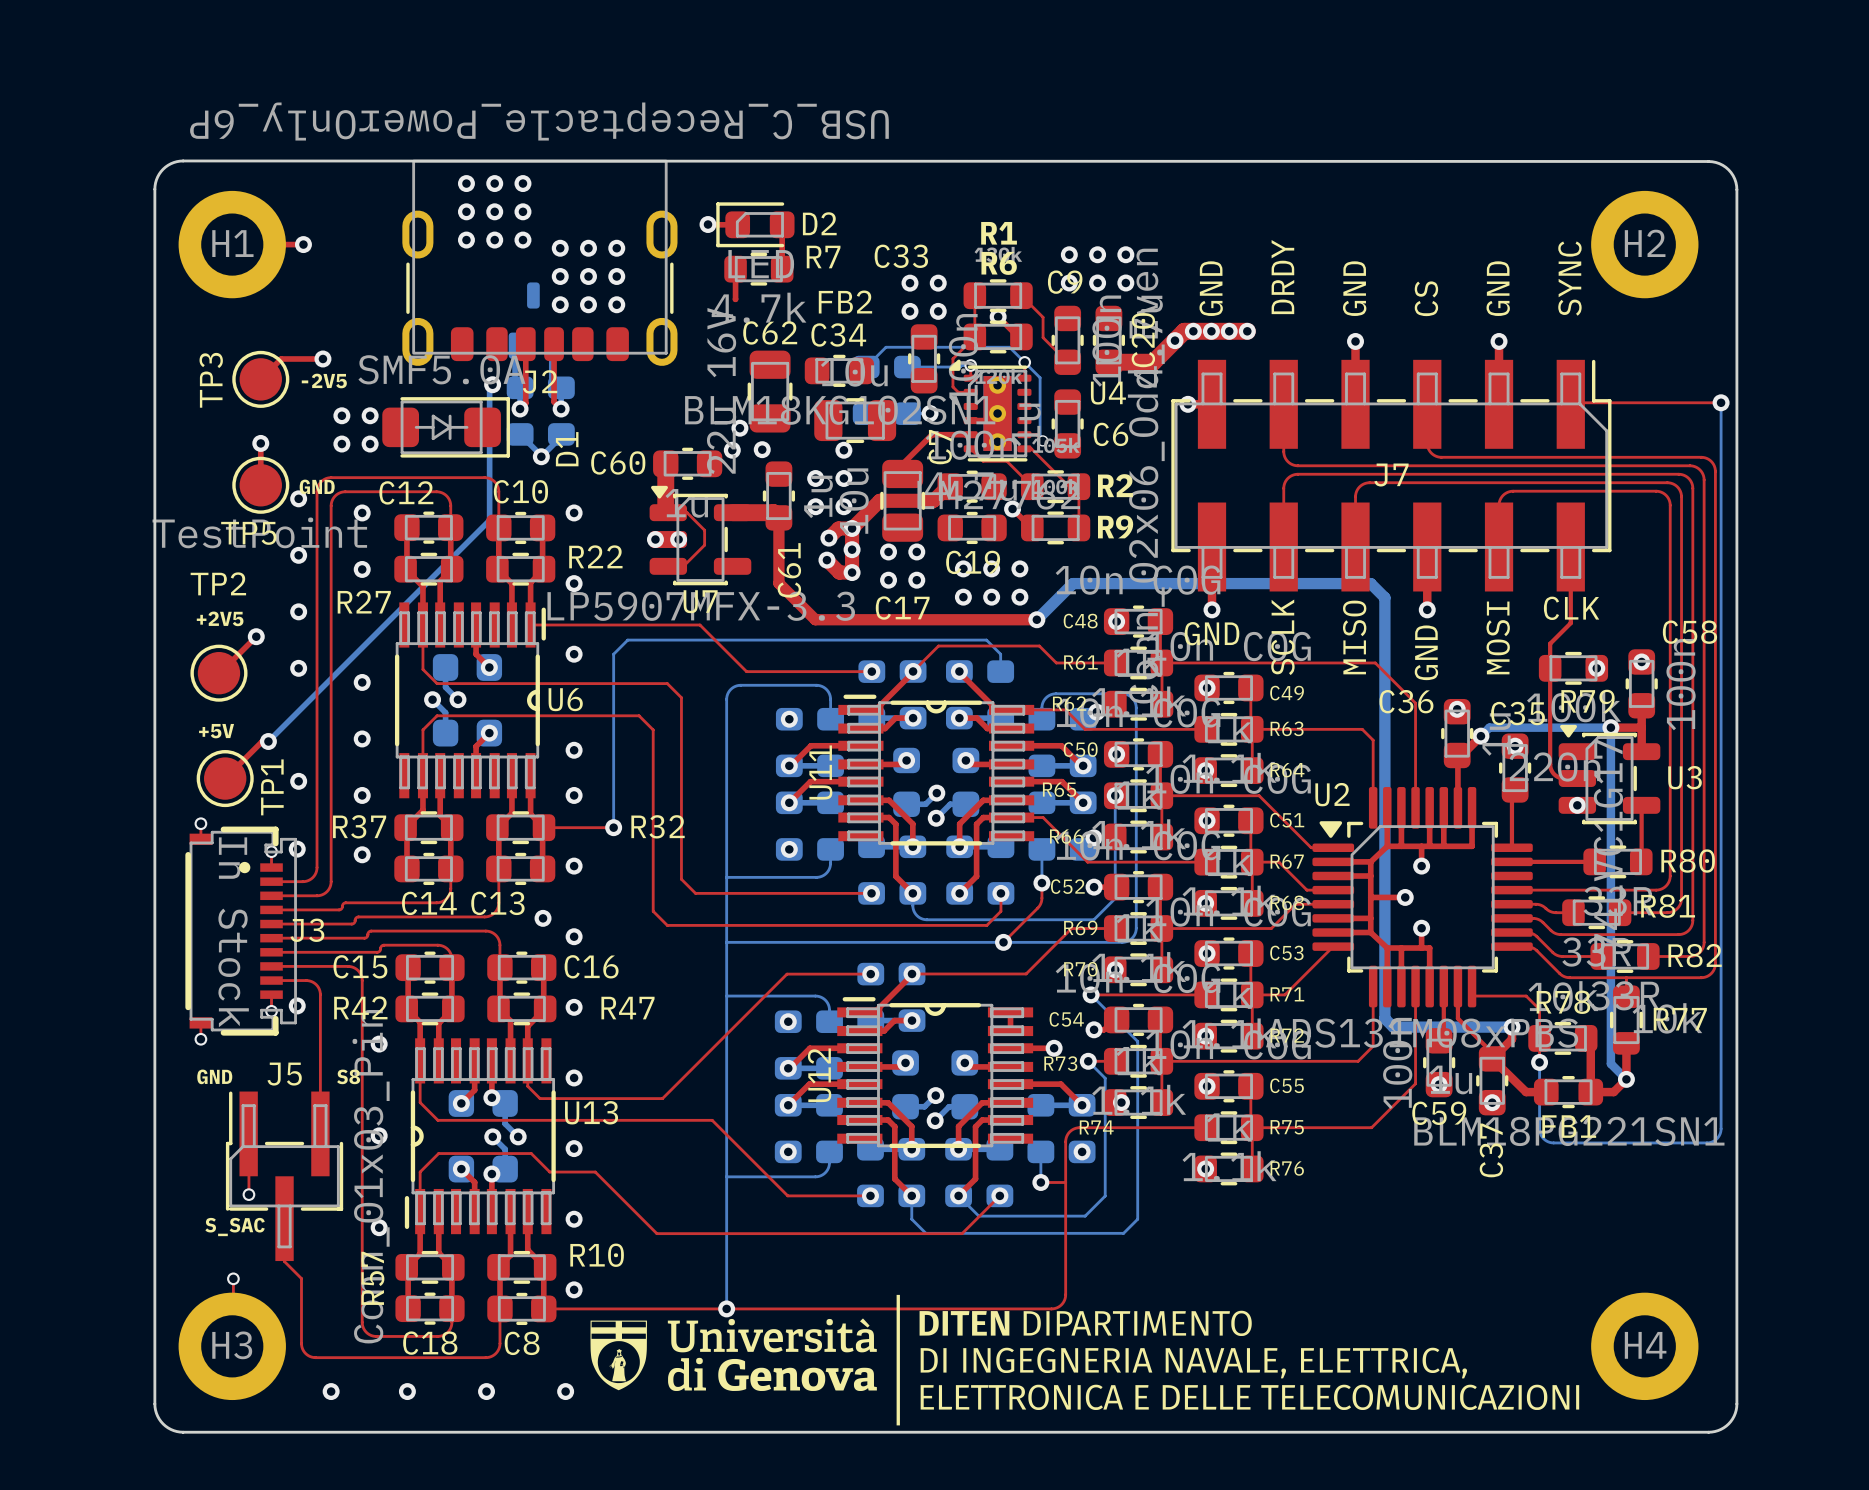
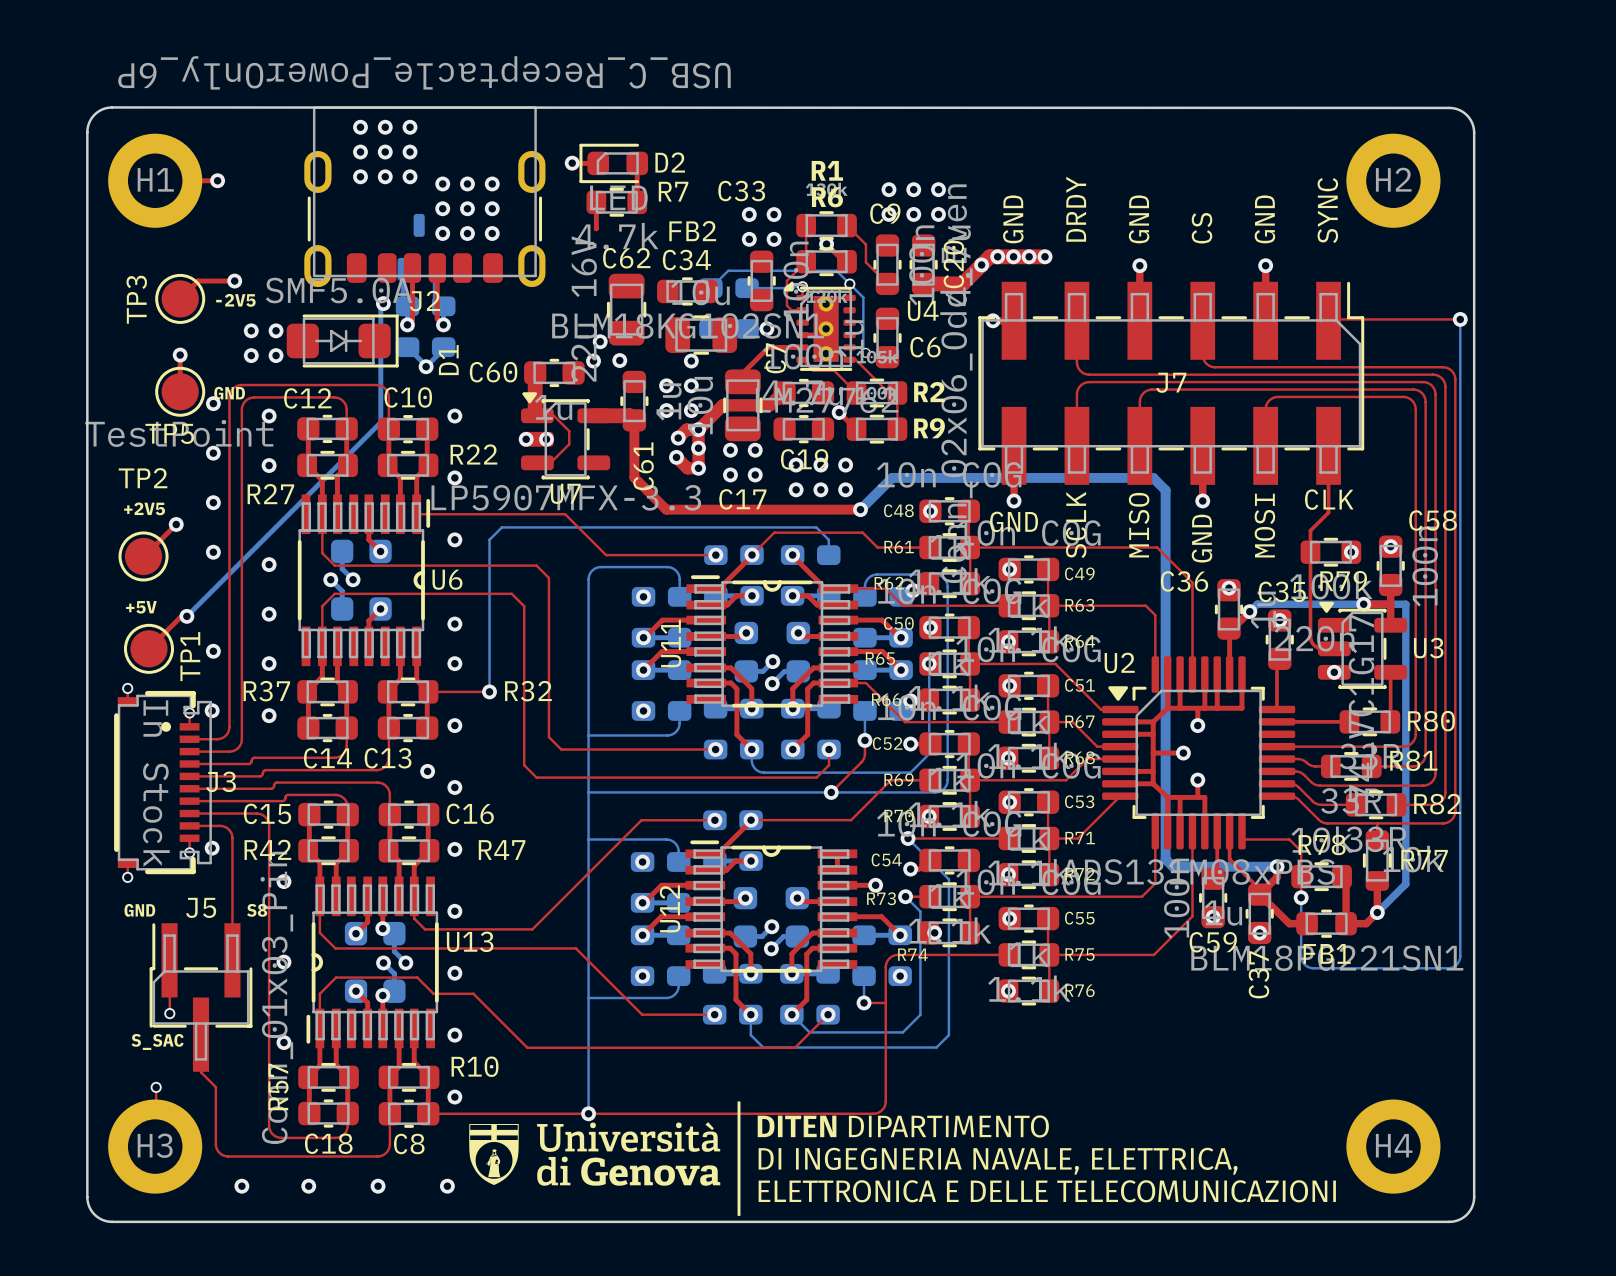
bottom track: (1610, 727) (1610, 1063) (1626, 1079) -> (1363, 604) (1405, 604) (1405, 884) (1377, 912)

